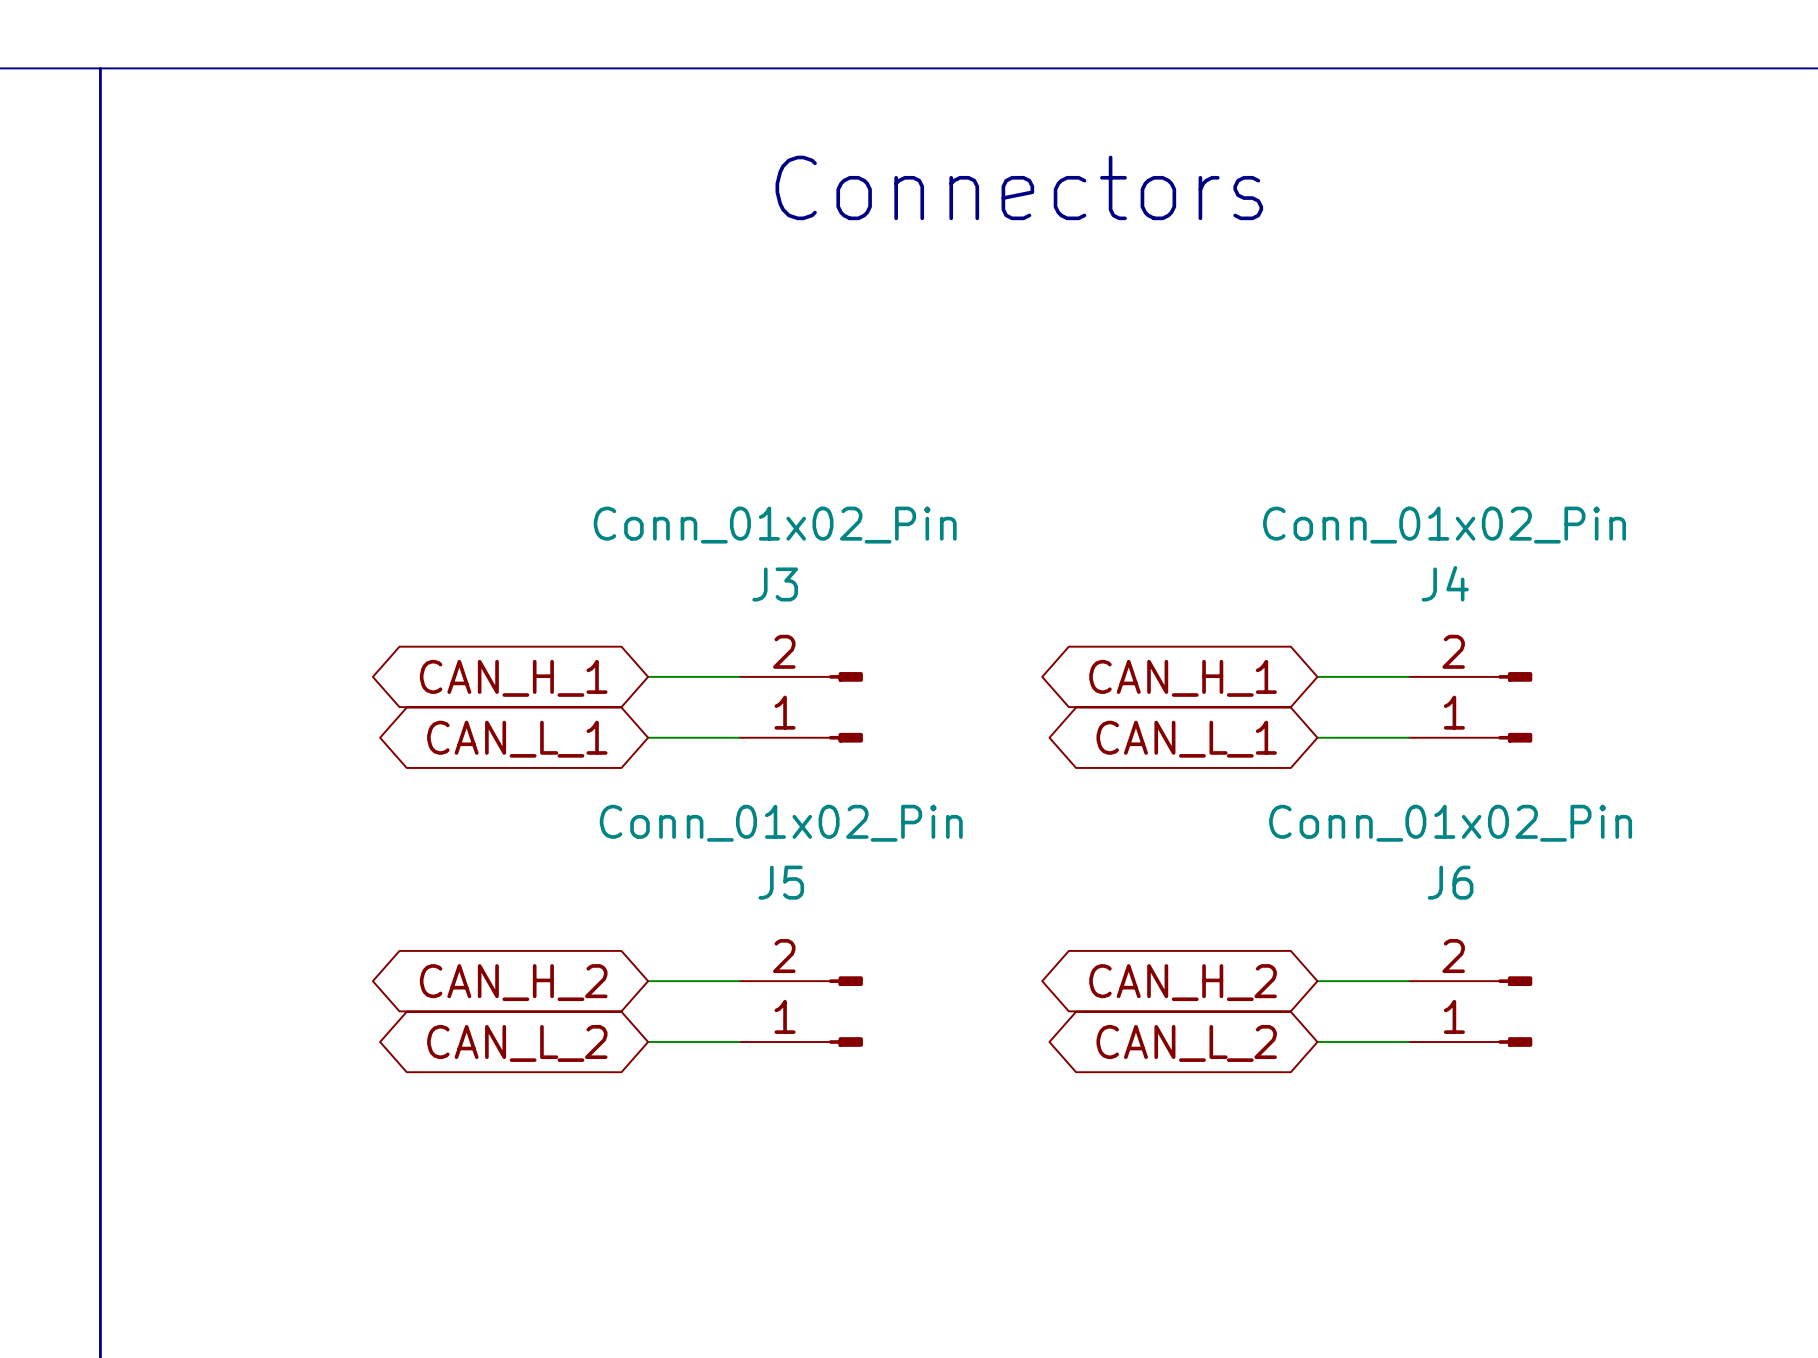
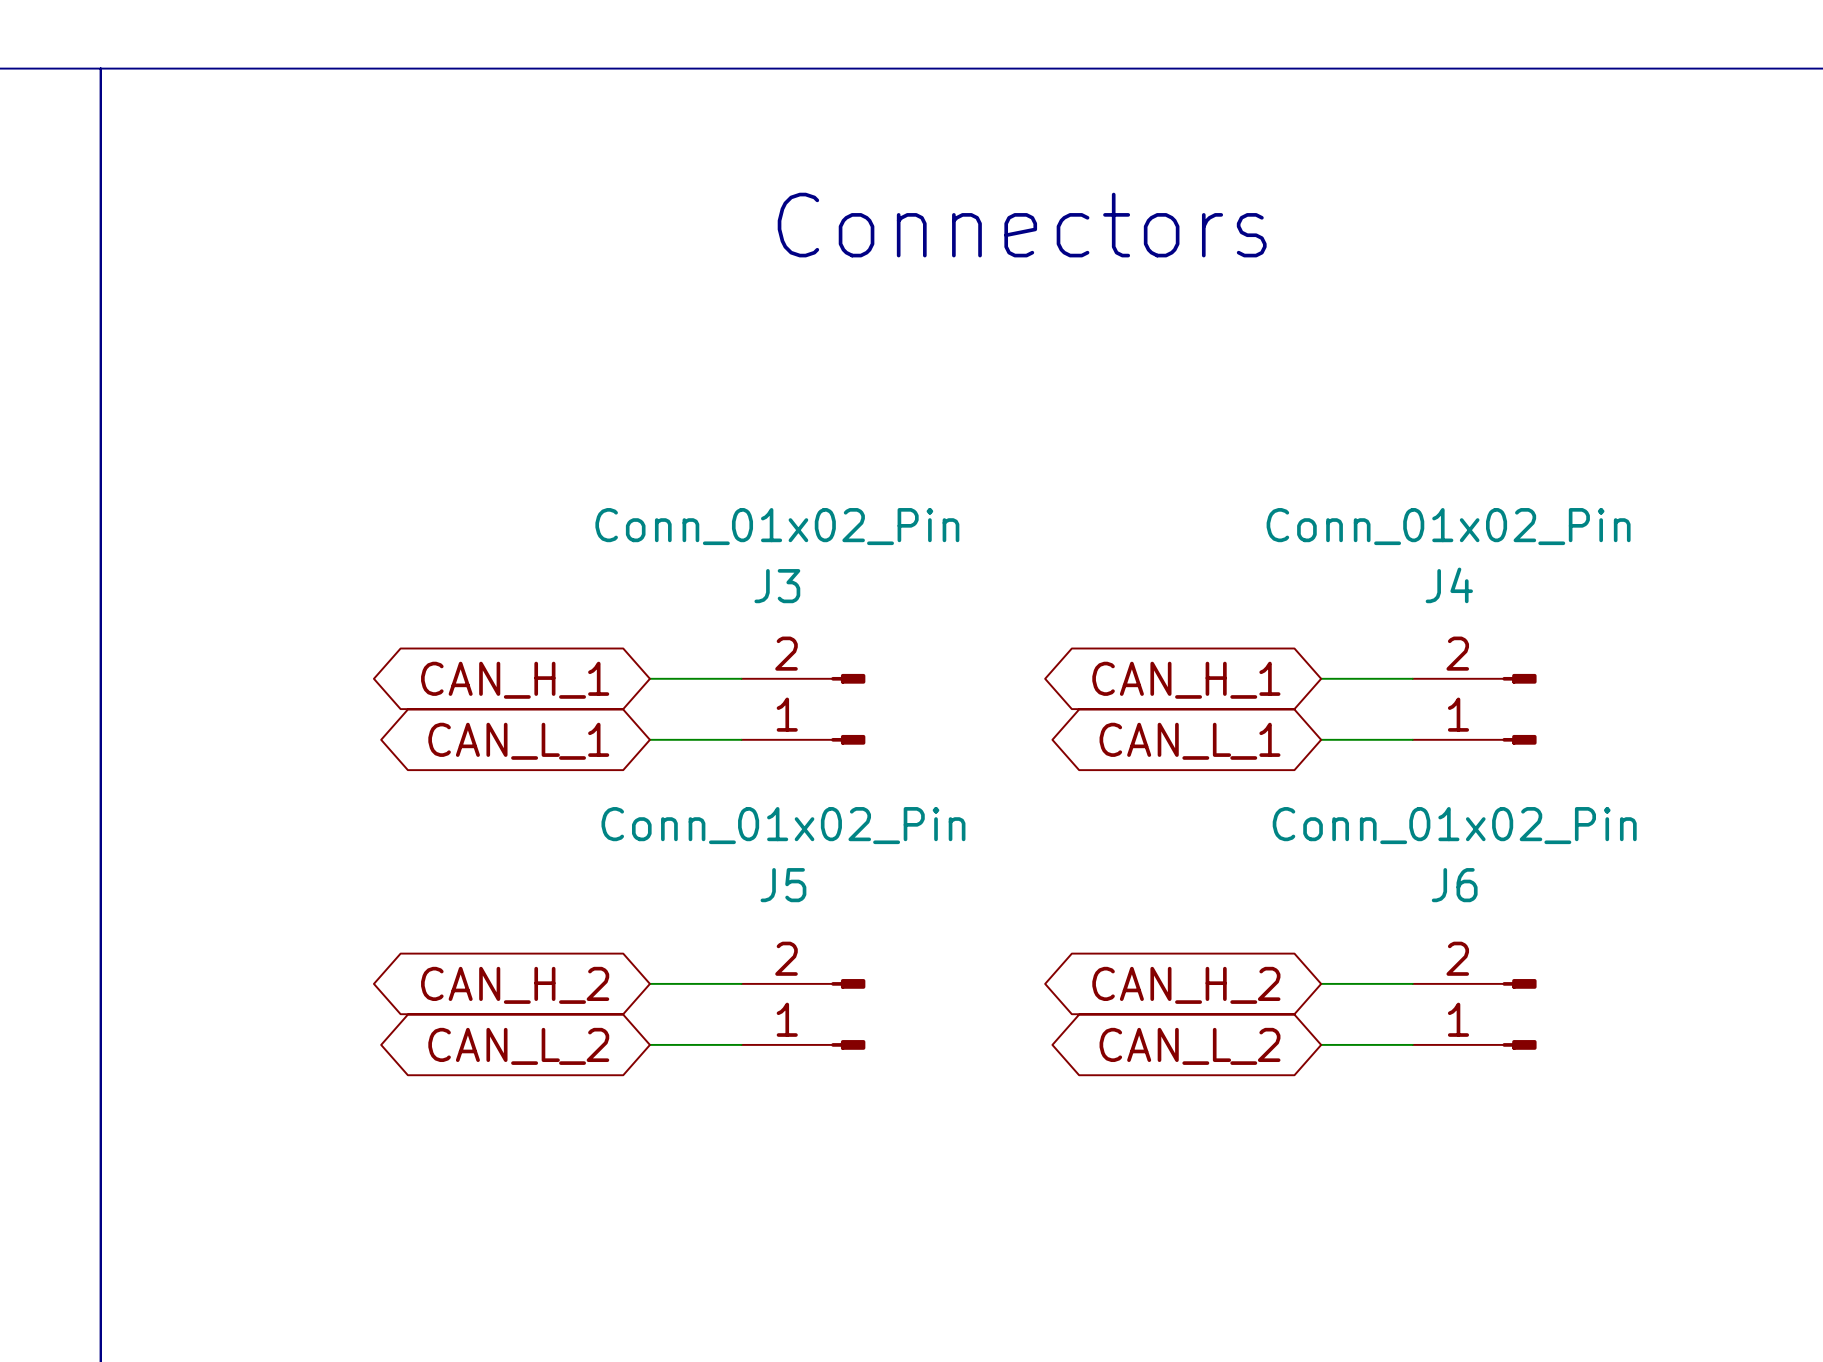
text position: Connectors (1019, 187) -> Connectors (1022, 225)

